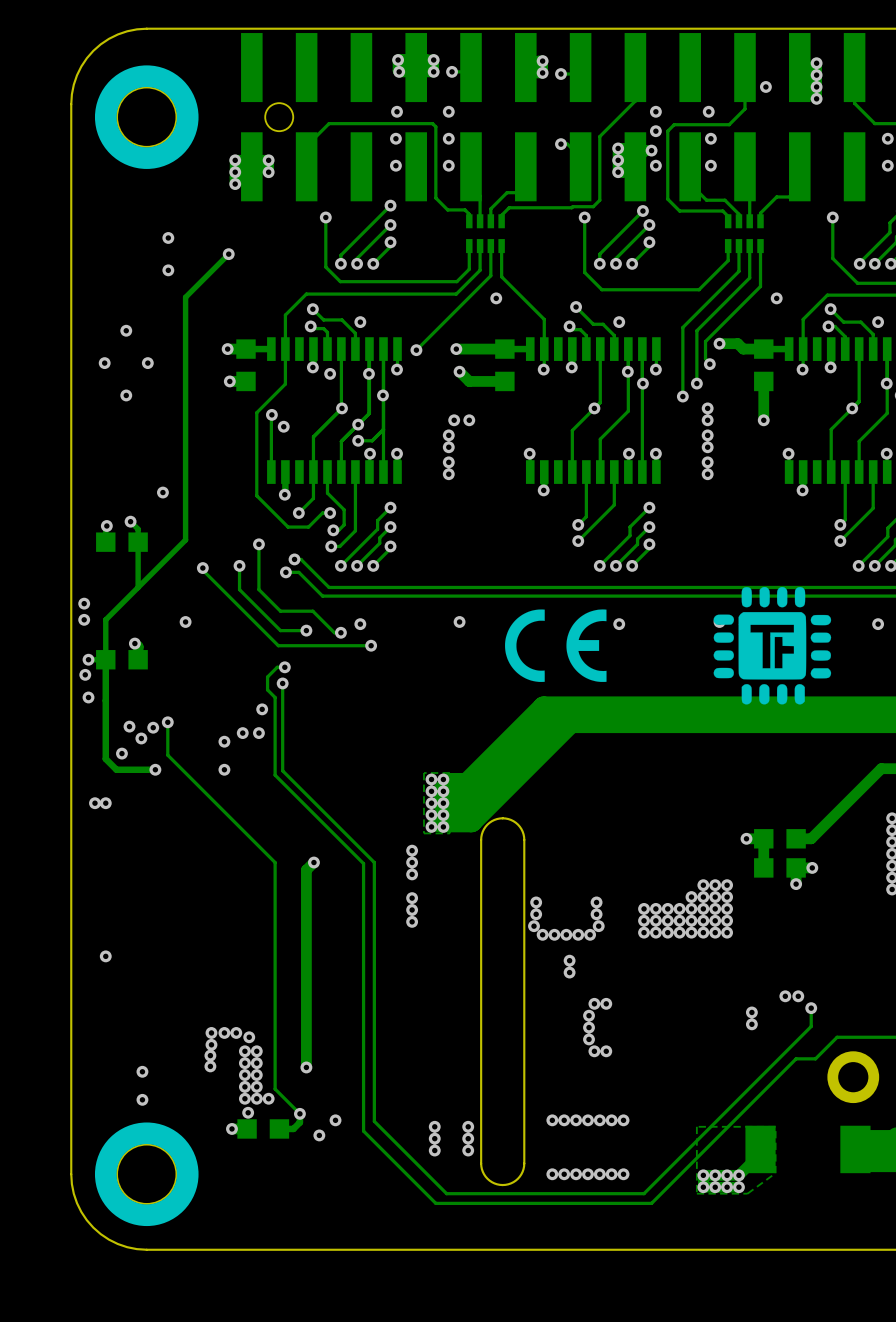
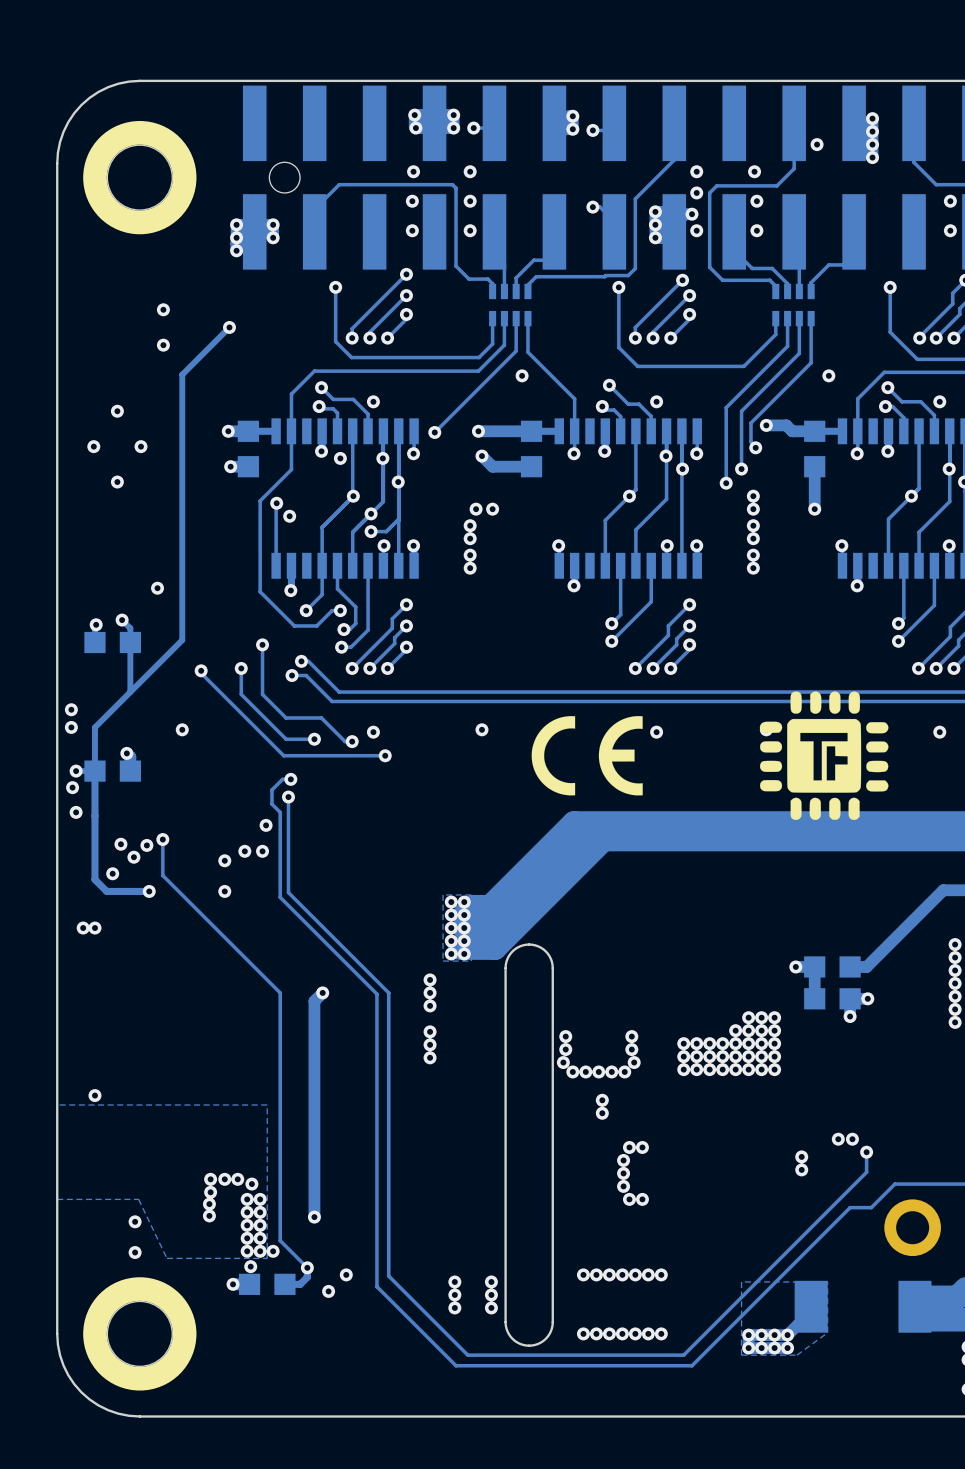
zone outline: none -> (267, 1105) (267, 1258) (166, 1258) (138, 1199) (57, 1199) (57, 1105) (267, 1105)

